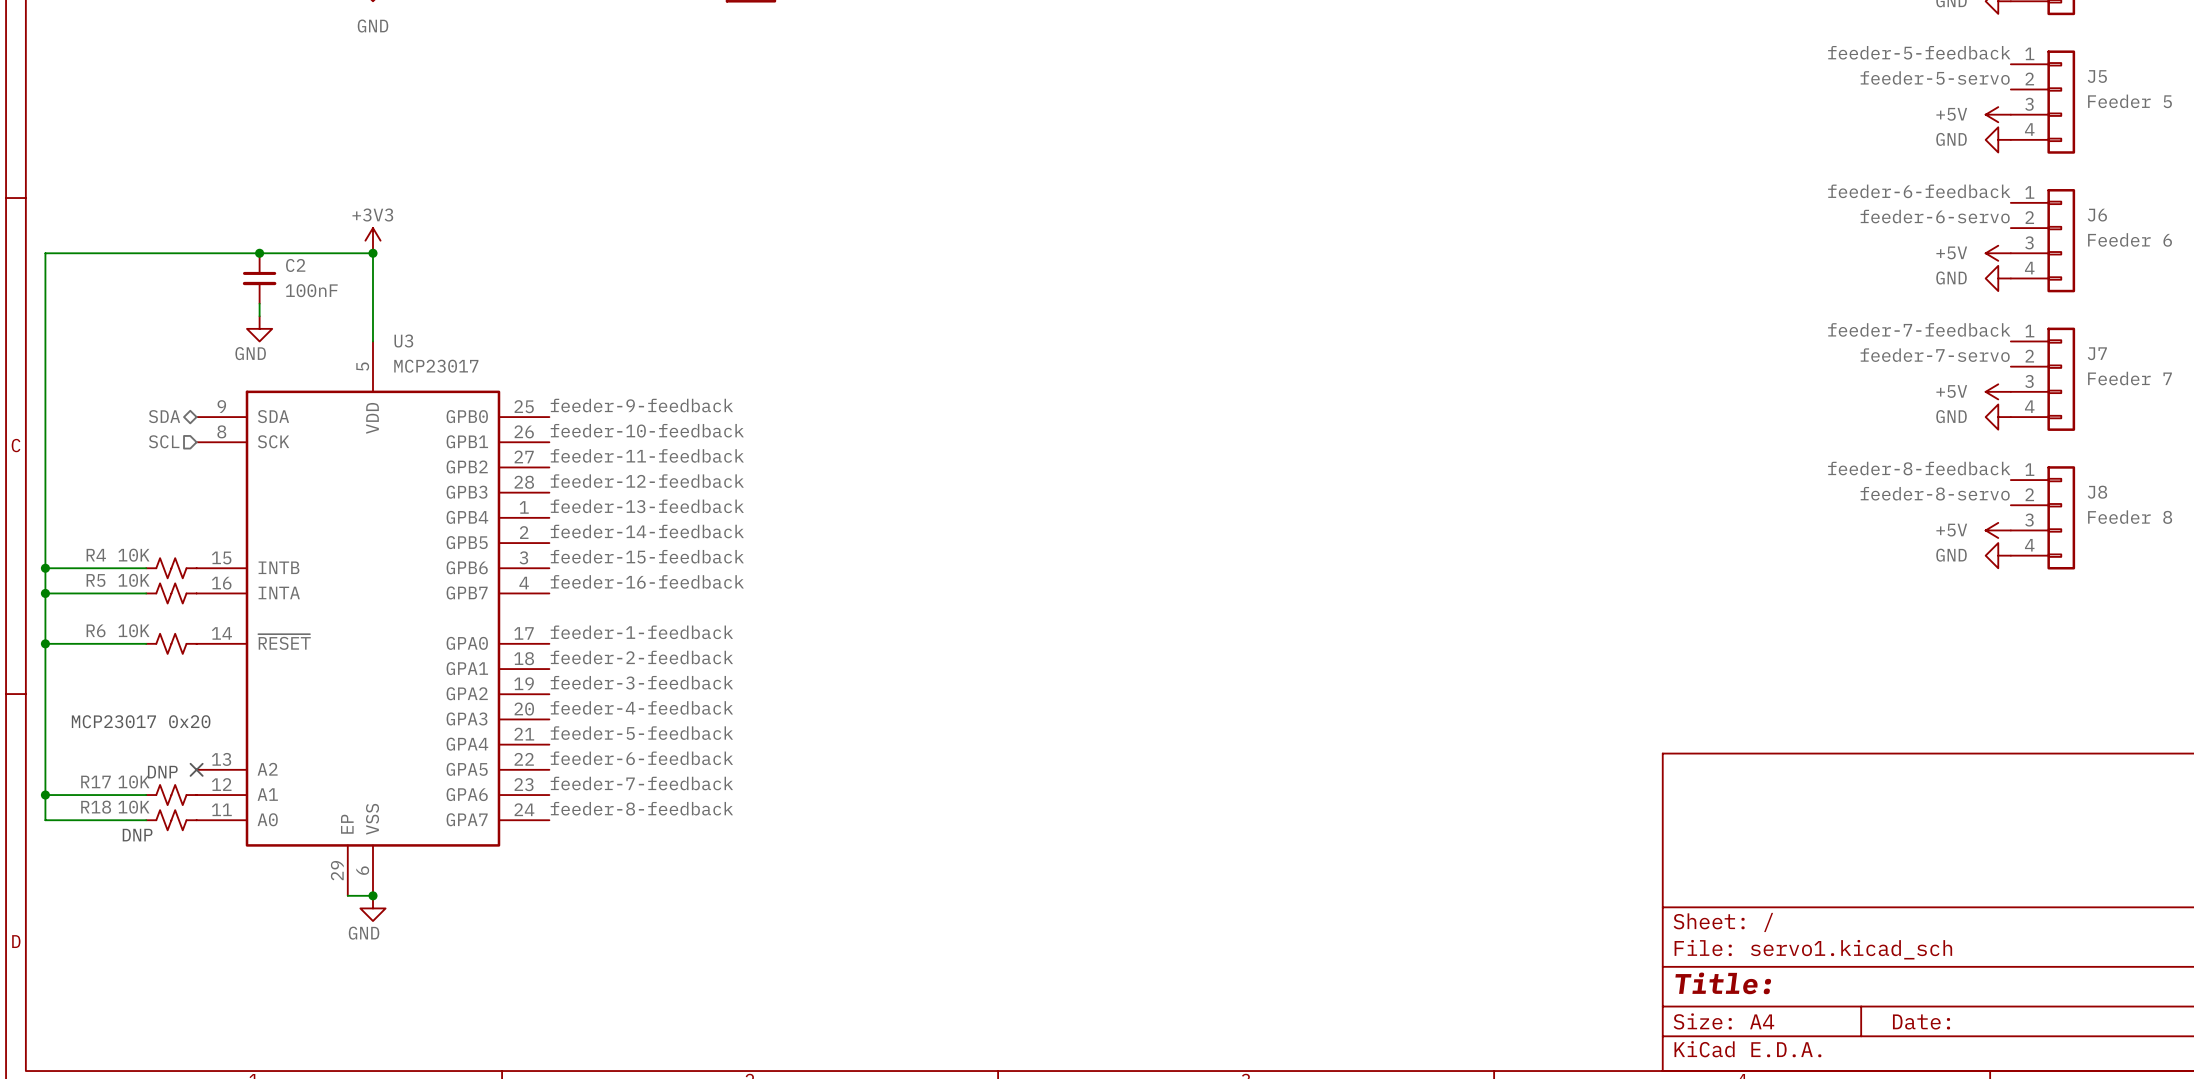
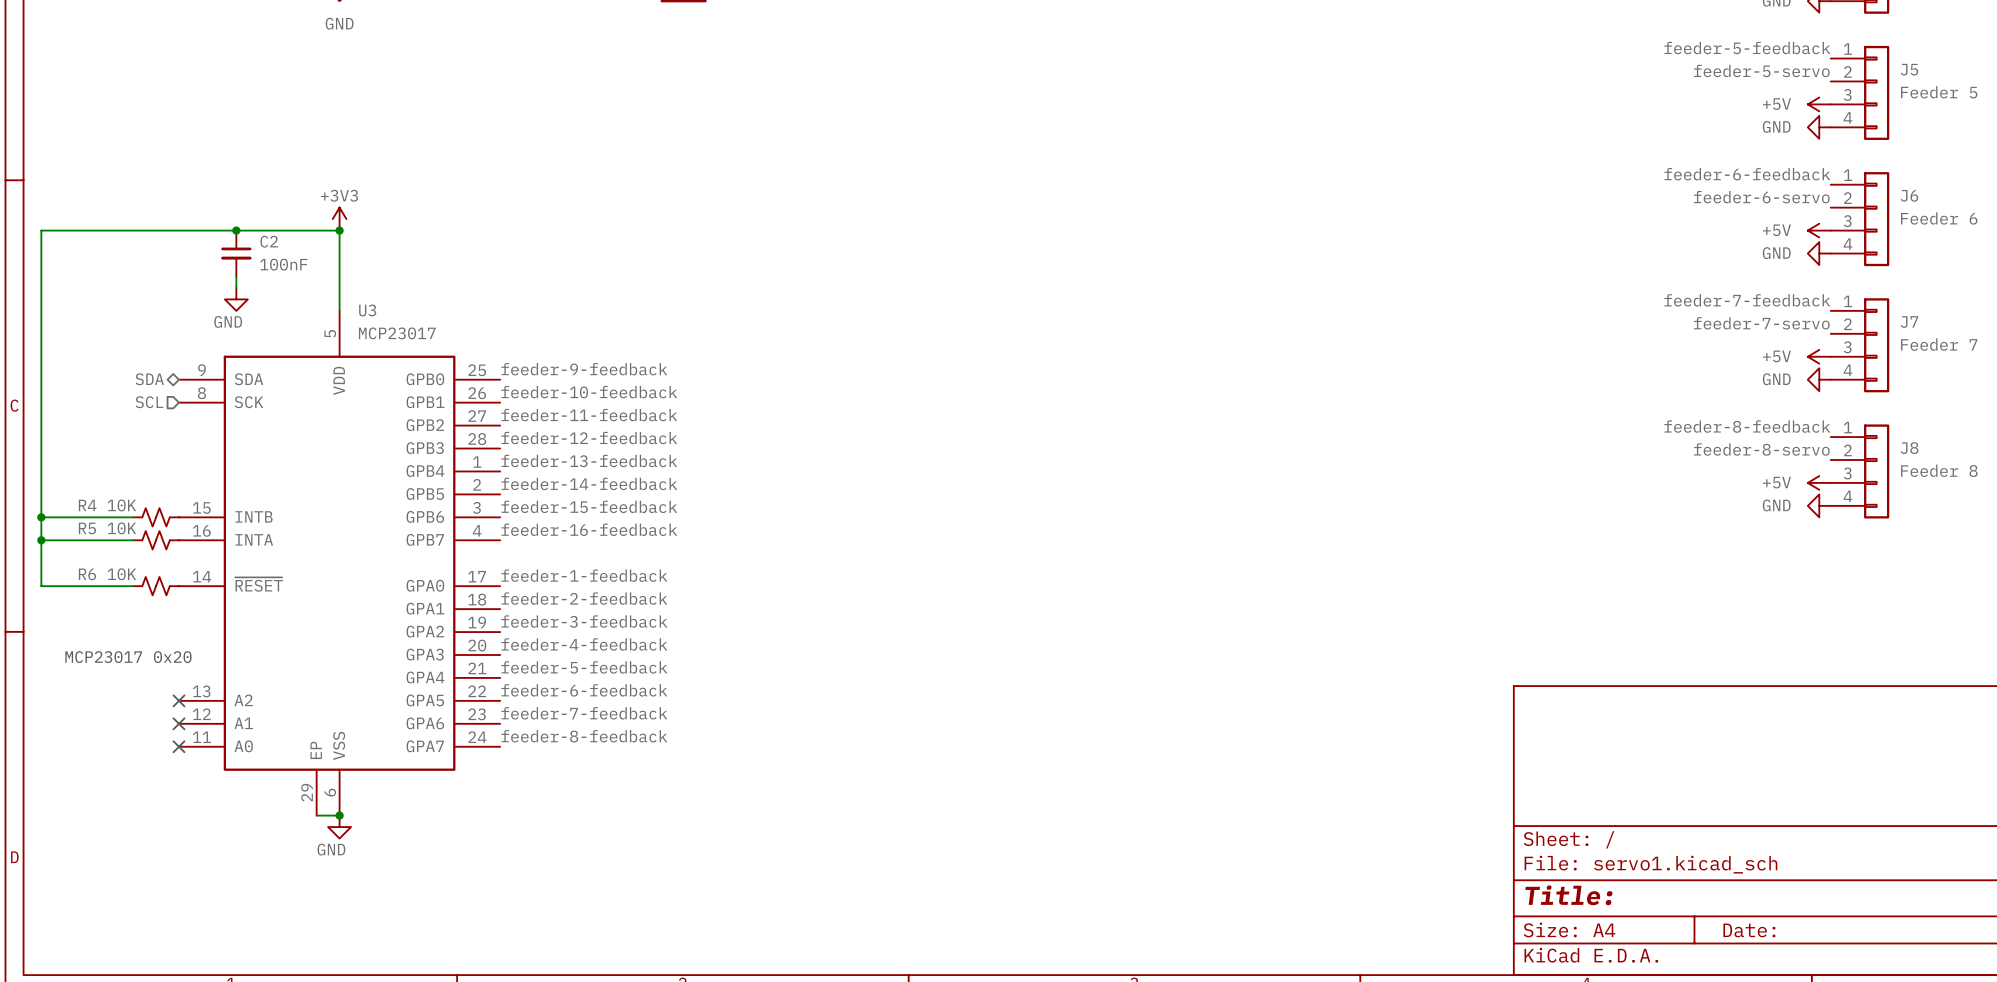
wire: (45, 643) (45, 820) (146, 820) -> none
junction: (45, 643) -> none
text: DNP (162, 772) -> none
wire: (45, 795) (146, 795) -> none
junction: (45, 795) -> none
R17: 10K (171, 795) -> none
no-connect mark: none -> (179, 723)
R18: 10K (171, 820) -> none
no-connect mark: none -> (179, 746)
text: DNP (137, 835) -> none

